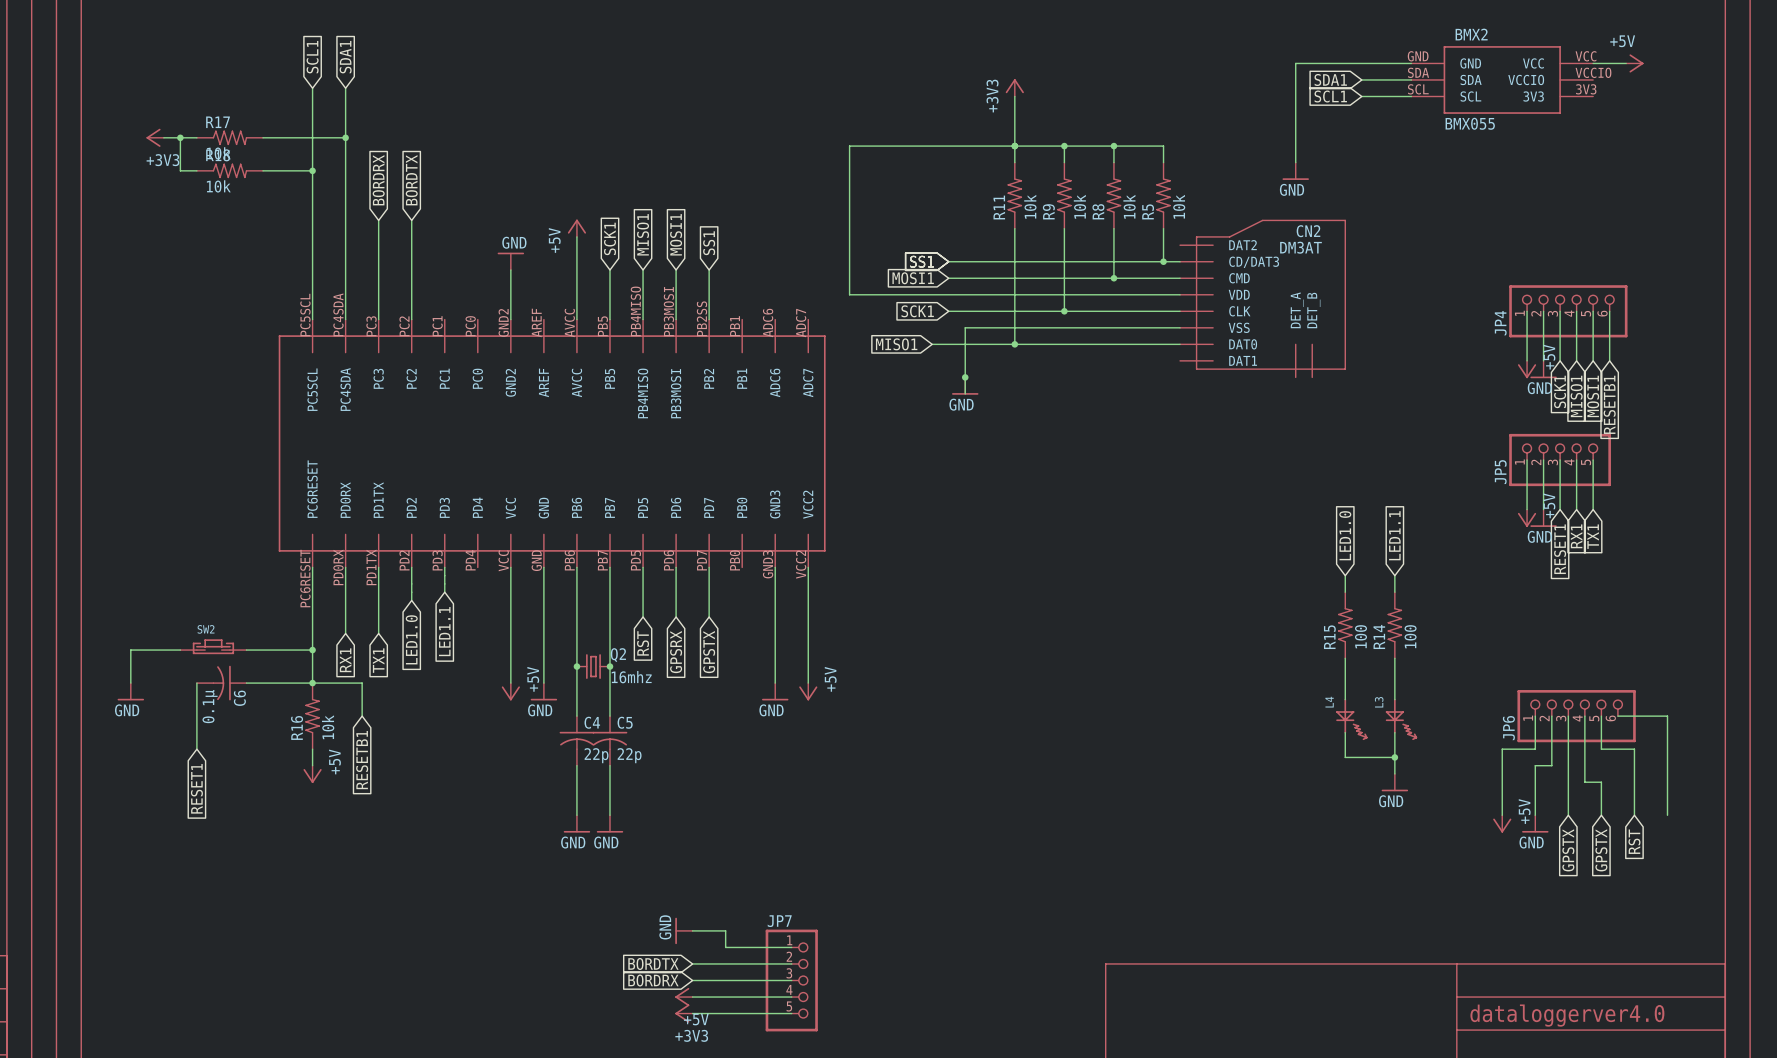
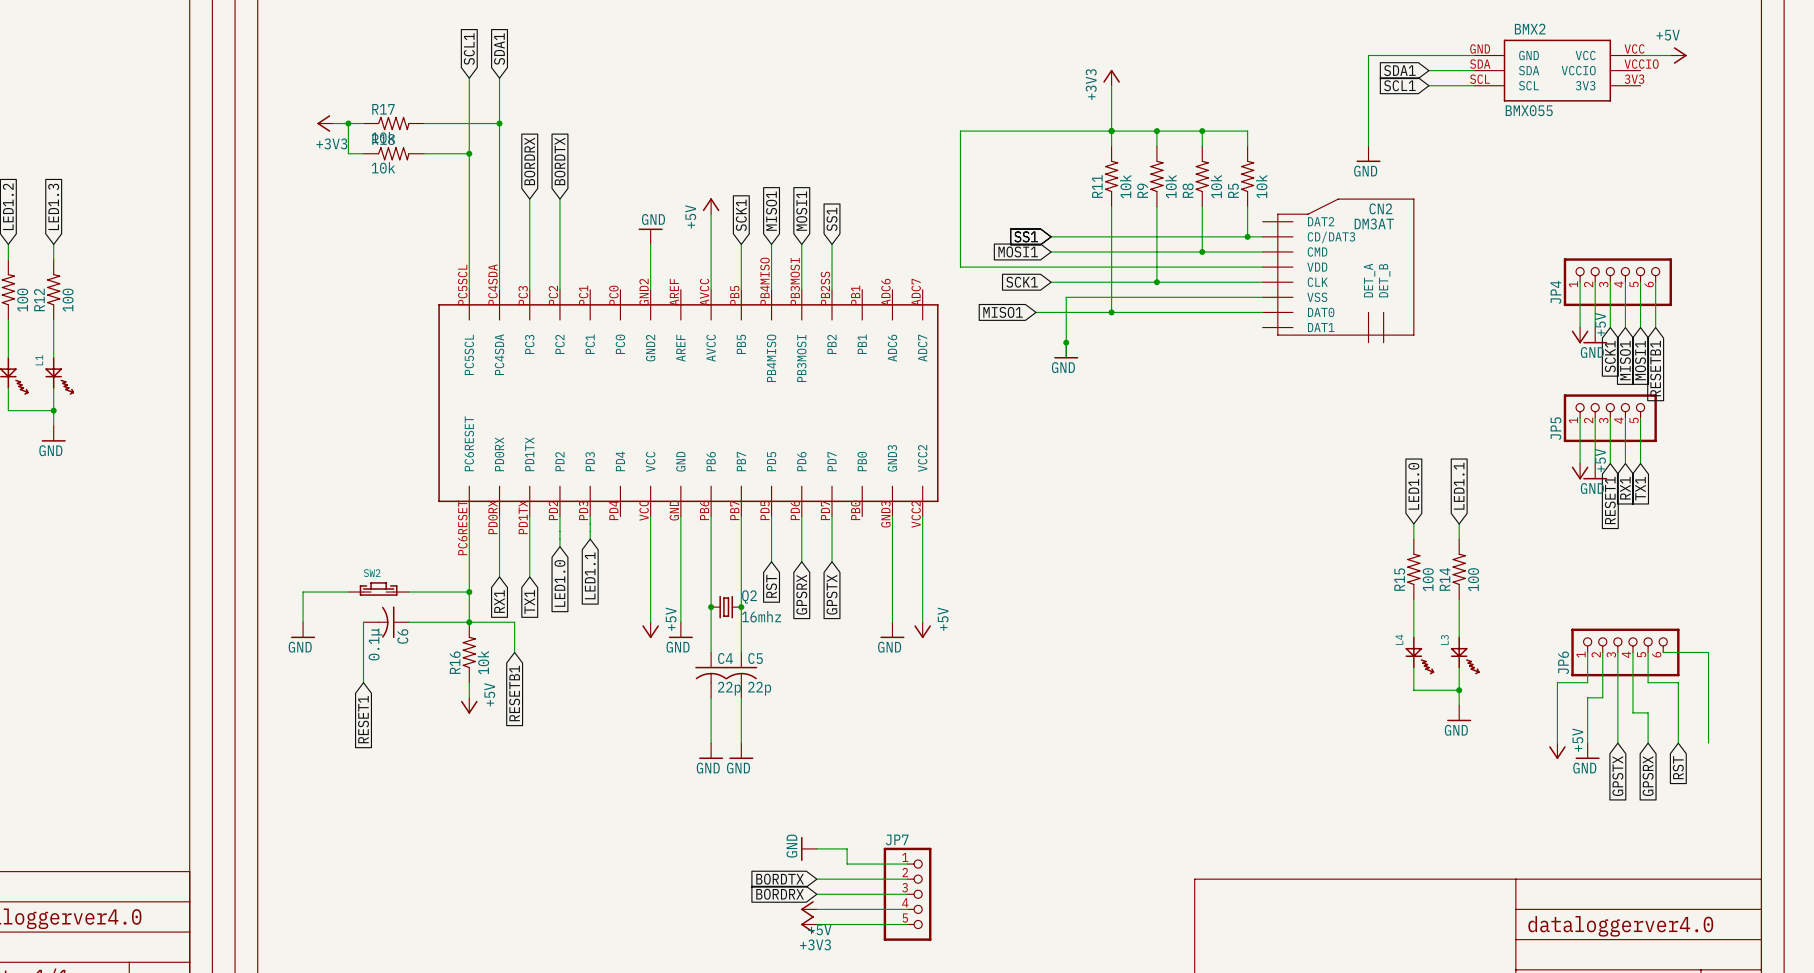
global label: GPSTX (1601, 850) -> GPSRX (1648, 776)

